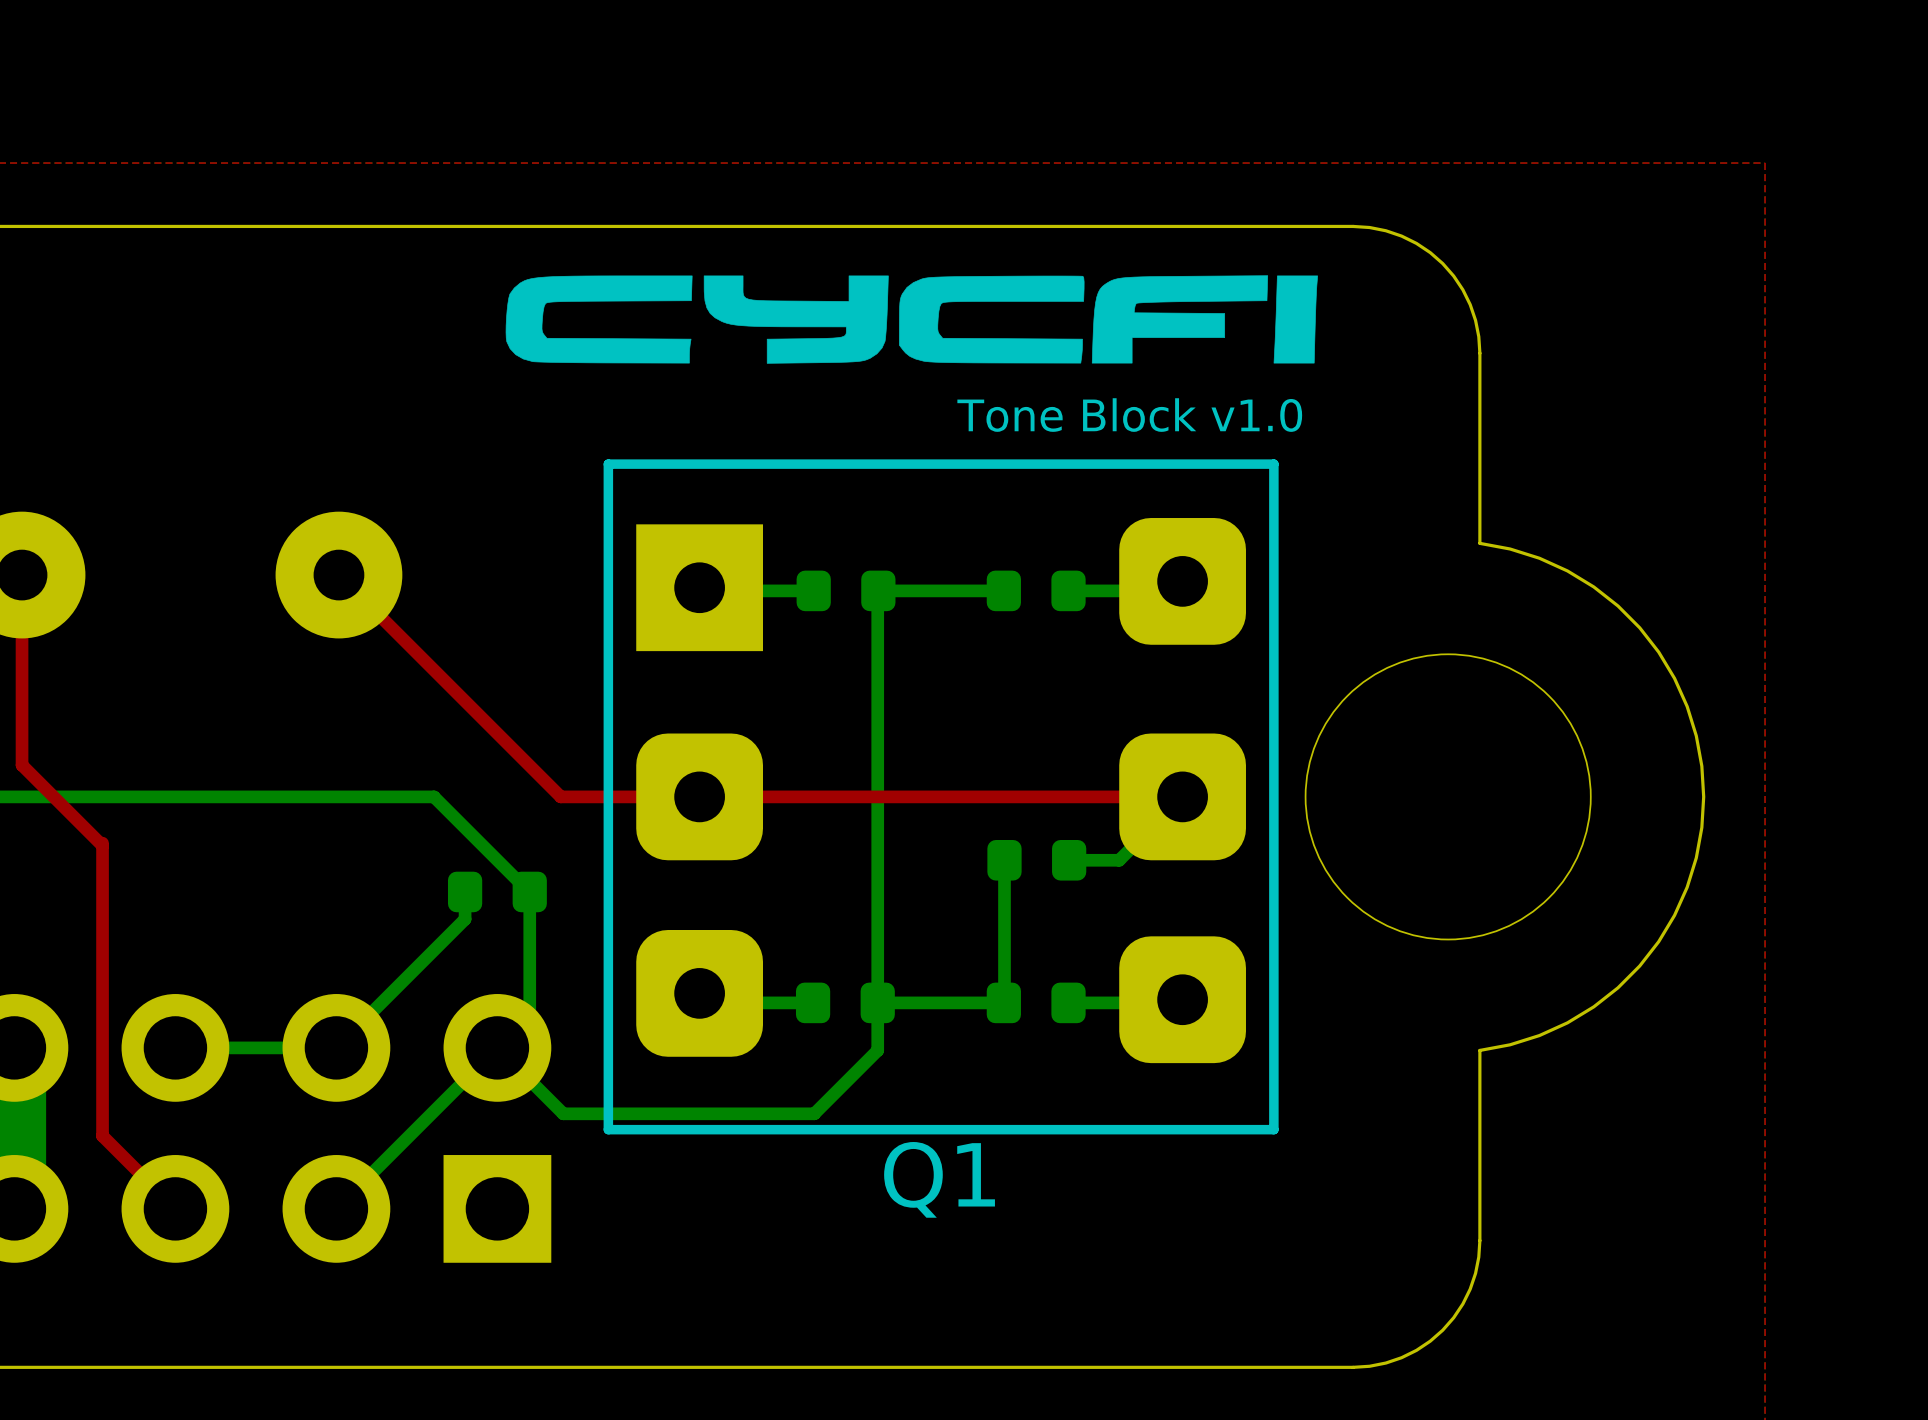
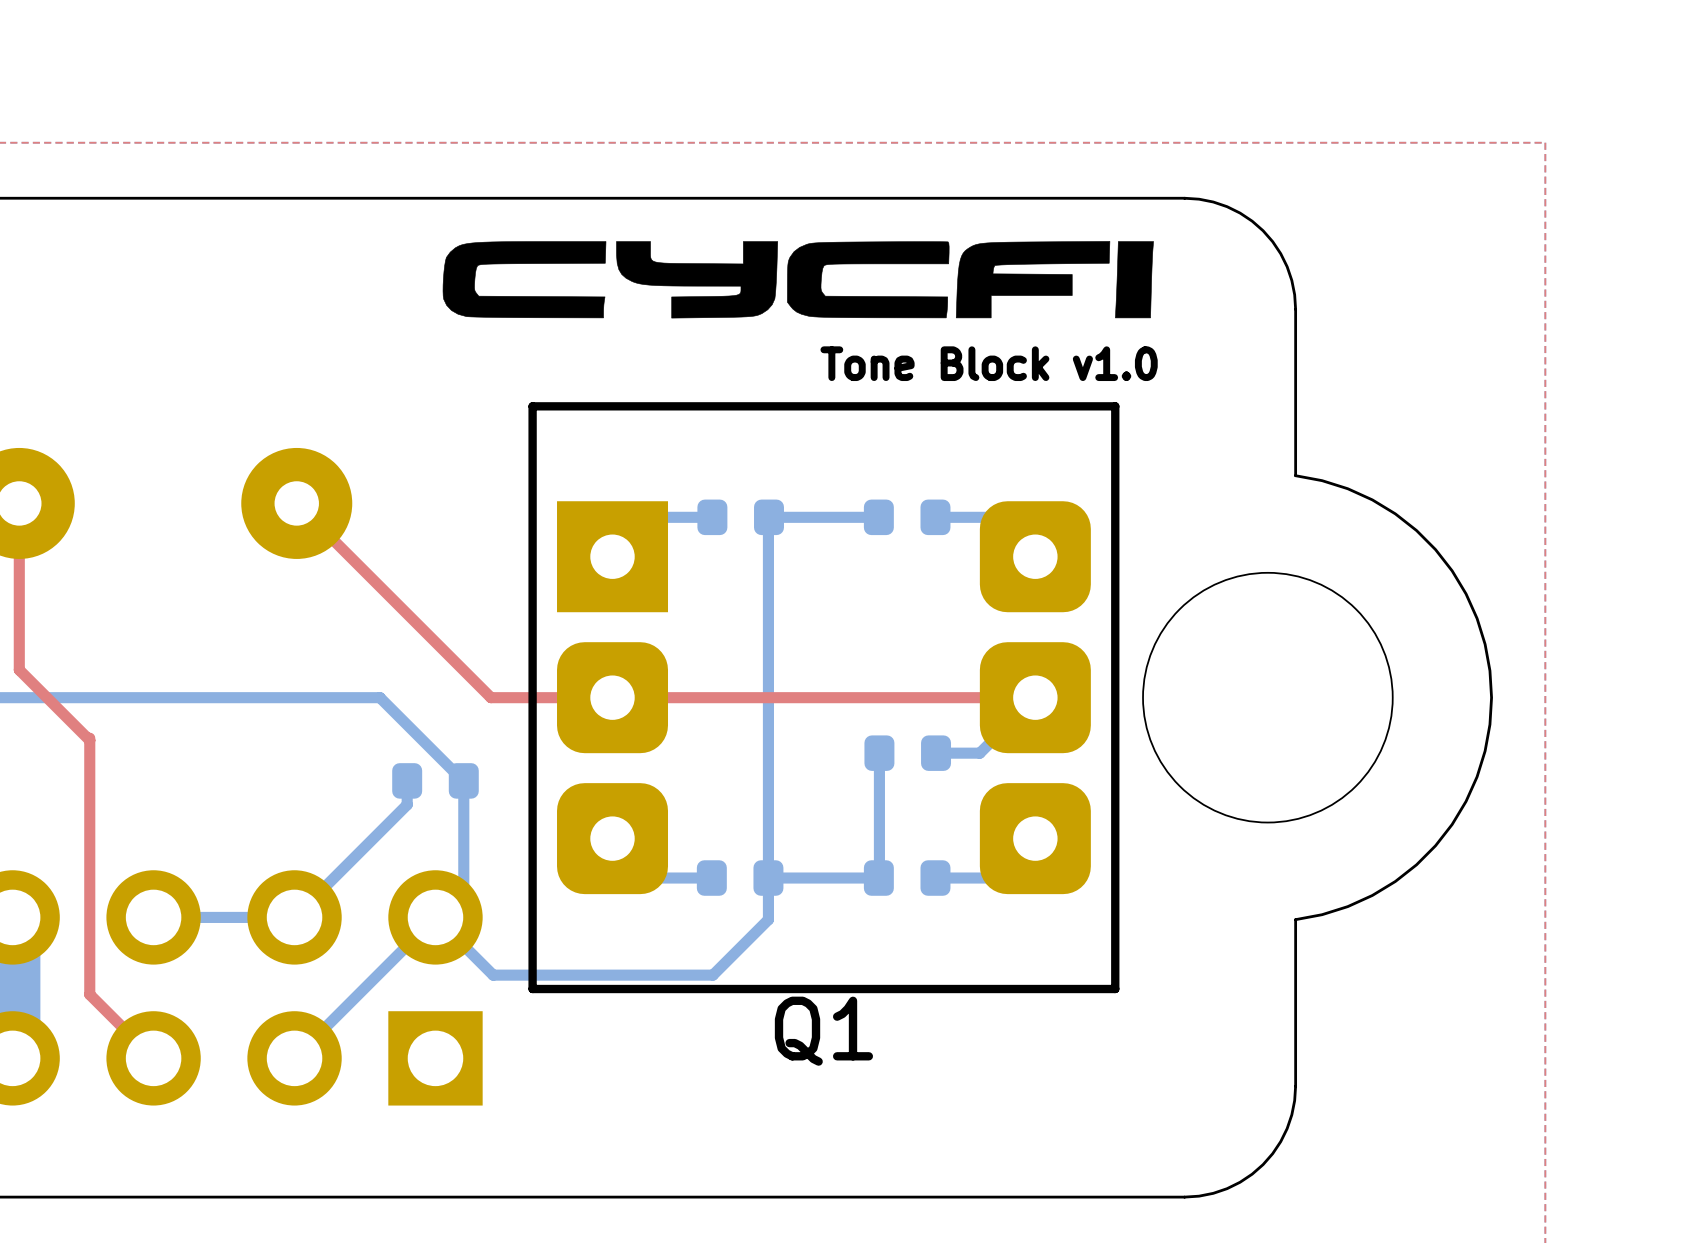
Q1 footprint: [603, 459, 1279, 1135] -> [528, 402, 1120, 994]

